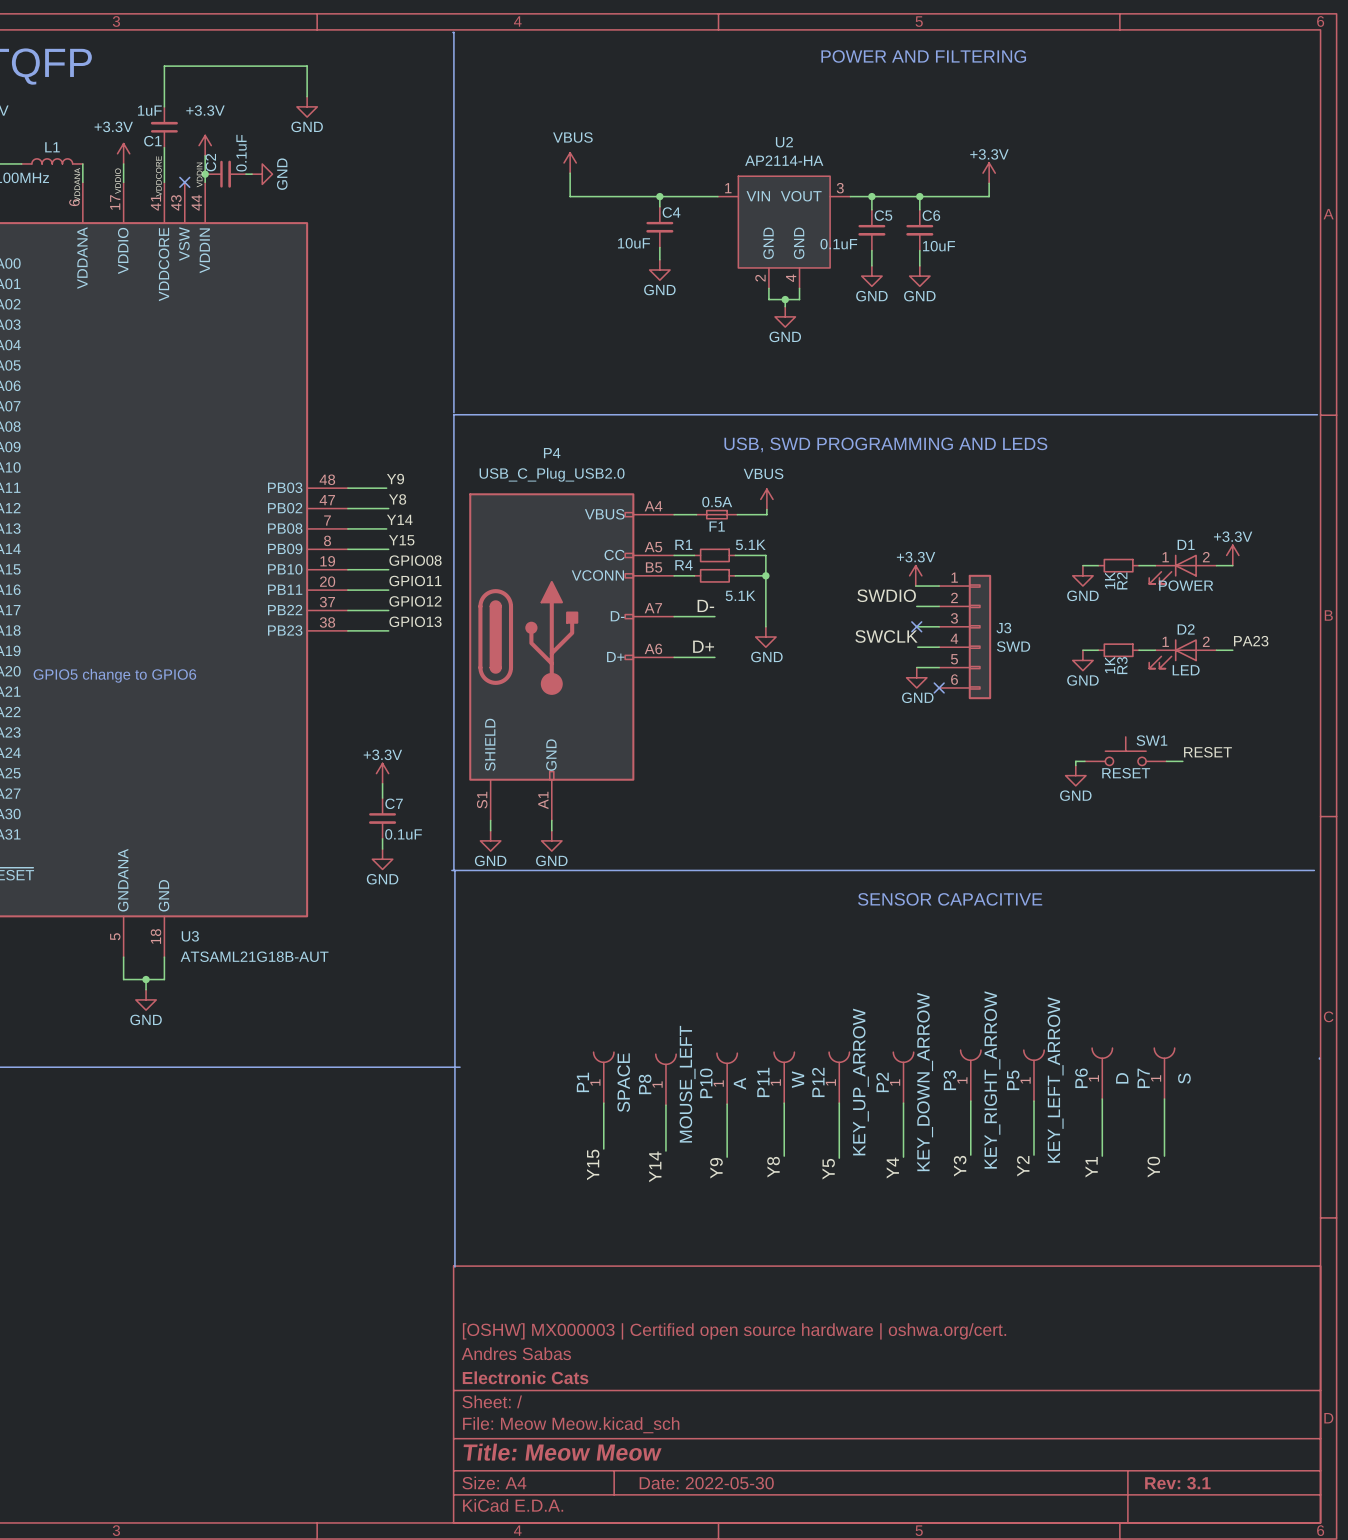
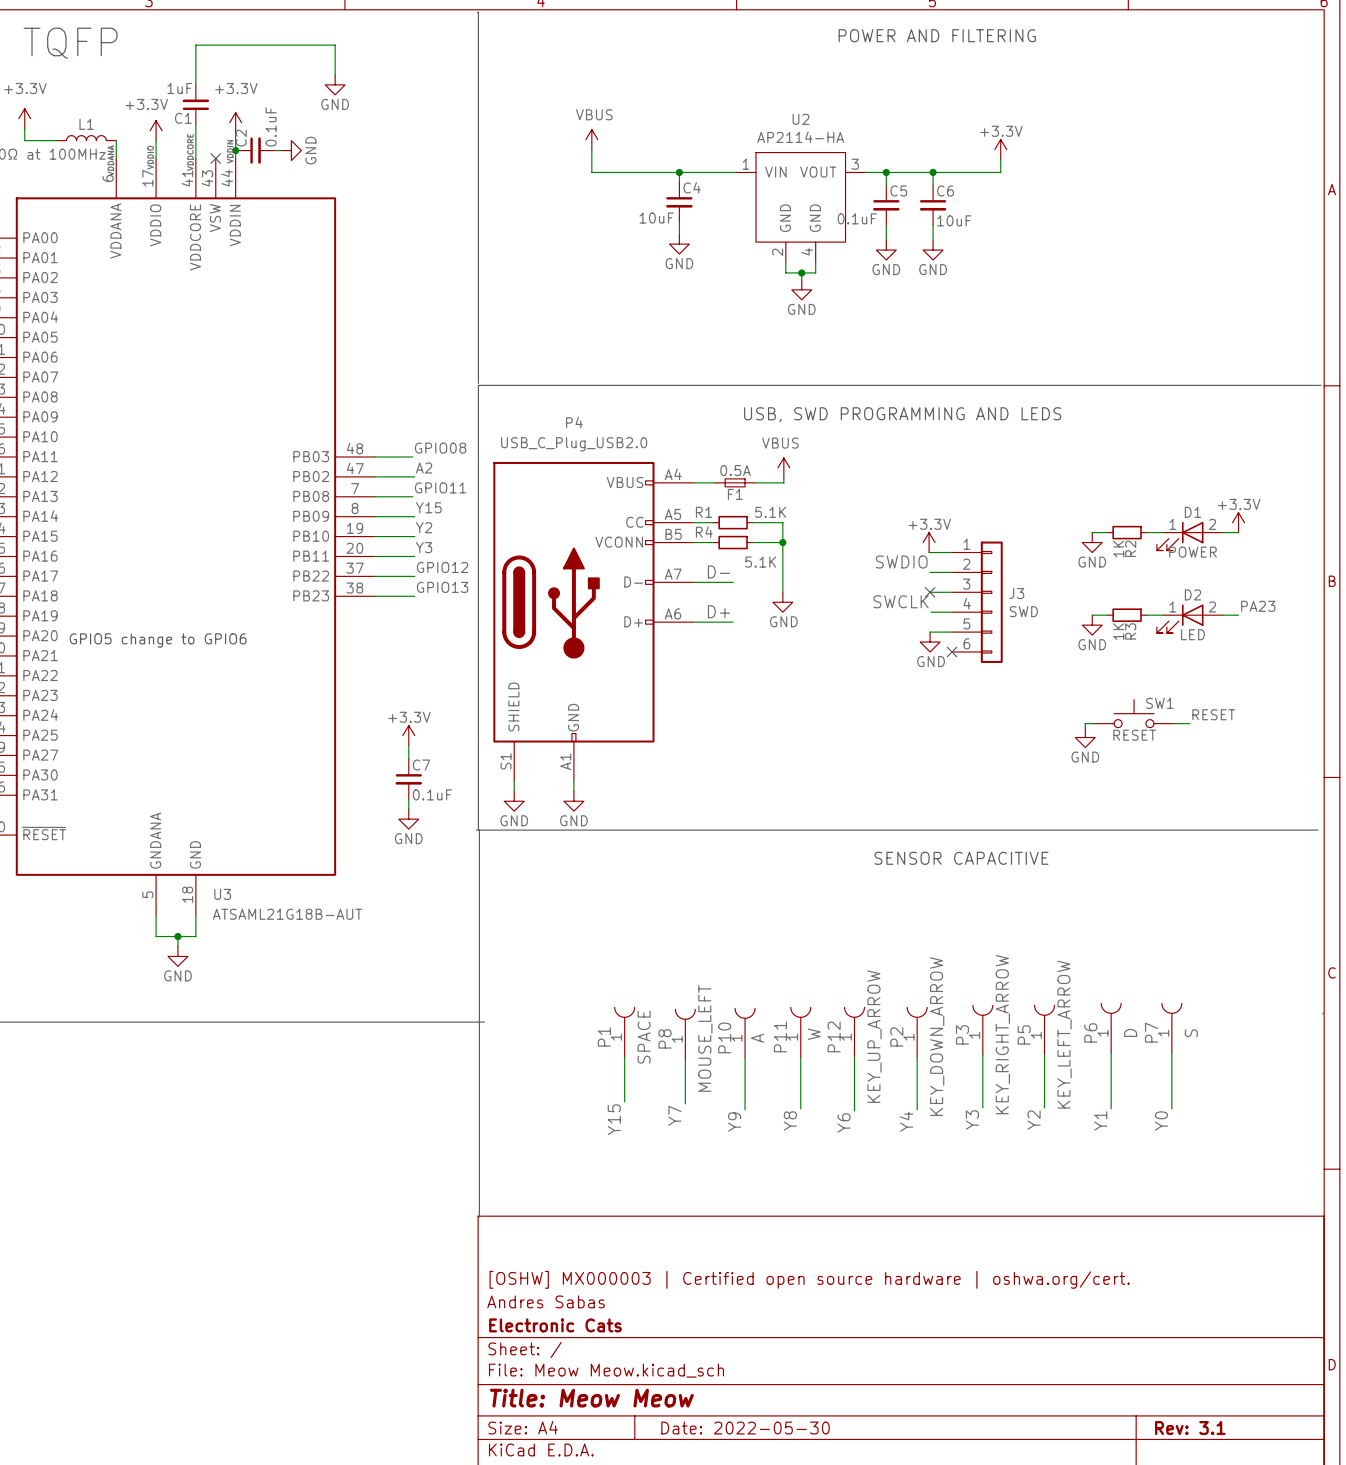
label: Y9 (395, 479) -> GPIO08 (440, 448)
label: Y8 (397, 499) -> A2 (424, 468)
label: Y14 (399, 519) -> GPIO11 (440, 487)
label: GPIO08 (415, 560) -> Y2 (424, 527)
label: GPIO11 (415, 581) -> Y3 (424, 547)
label: Y14 (655, 1166) -> Y7 (674, 1115)
label: Y5 (828, 1169) -> Y6 (844, 1122)

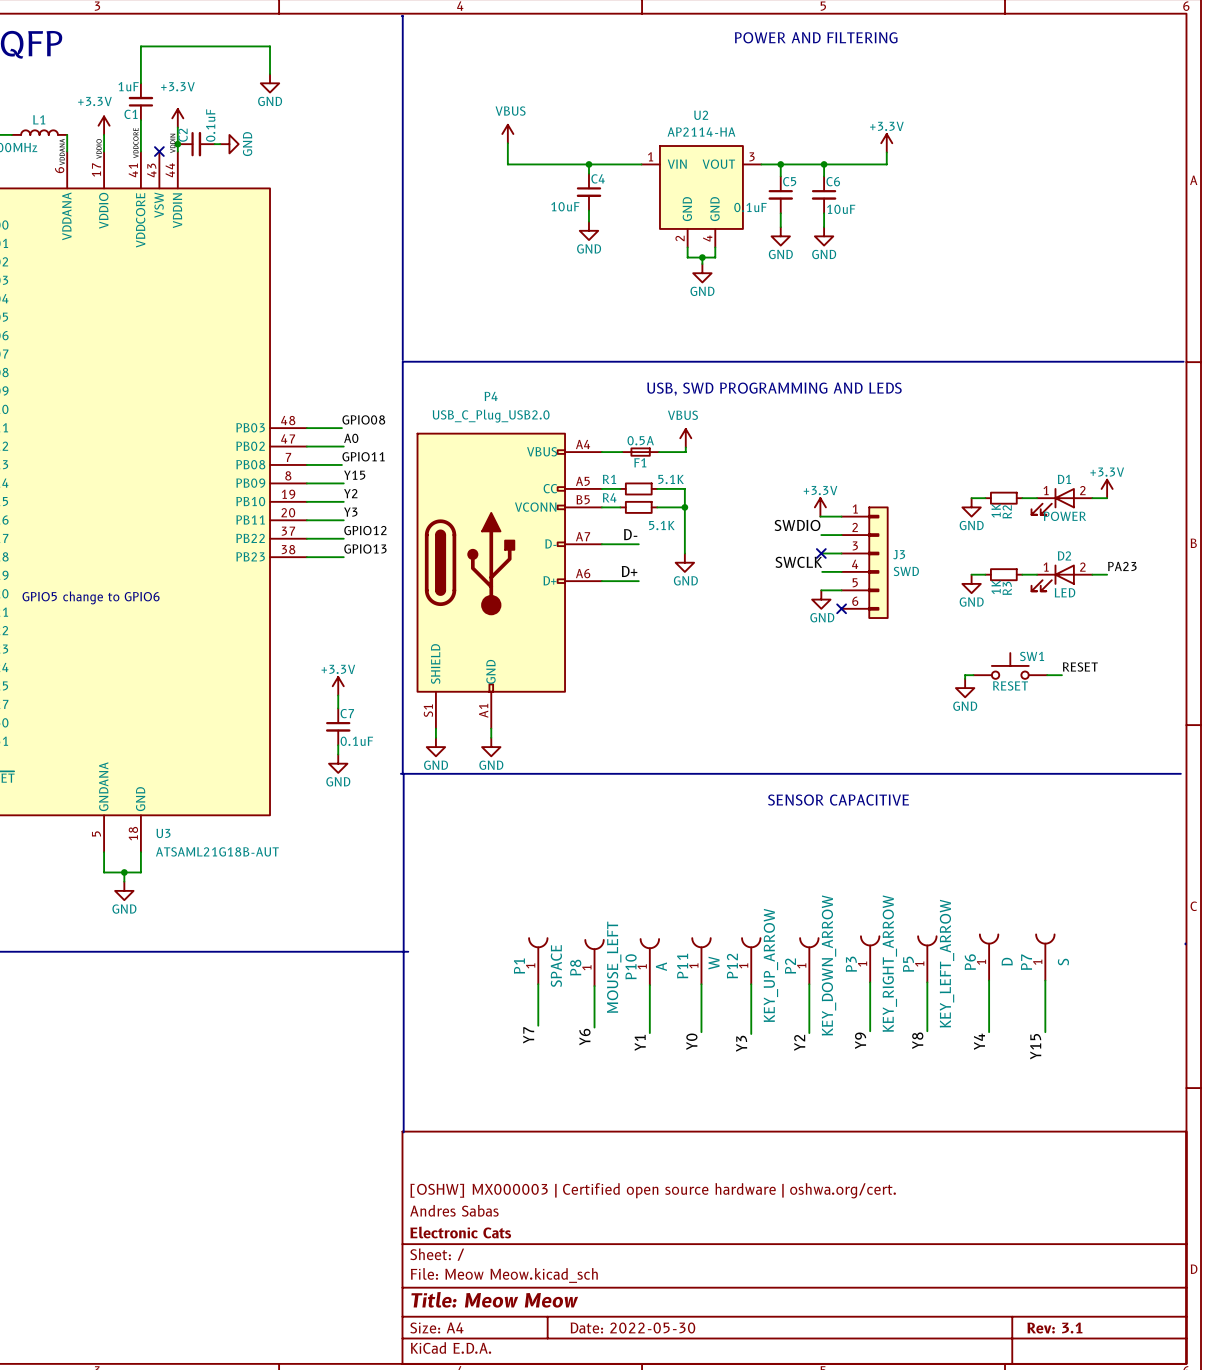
label: A2 (424, 468) -> A0 (351, 438)
label: Y7 (674, 1115) -> Y6 (584, 1037)
label: Y15 (614, 1119) -> Y7 (528, 1035)
label: Y3 (972, 1120) -> Y9 (860, 1040)
label: Y2 (1034, 1120) -> Y8 (917, 1040)
label: Y9 (734, 1121) -> Y1 (640, 1042)
label: Y8 (790, 1121) -> Y0 (691, 1041)
label: Y4 (906, 1121) -> Y2 (799, 1042)
label: Y1 (1100, 1121) -> Y4 (979, 1041)
label: Y0 (1161, 1121) -> Y15 (1035, 1046)
label: Y6 (844, 1122) -> Y3 (741, 1043)

